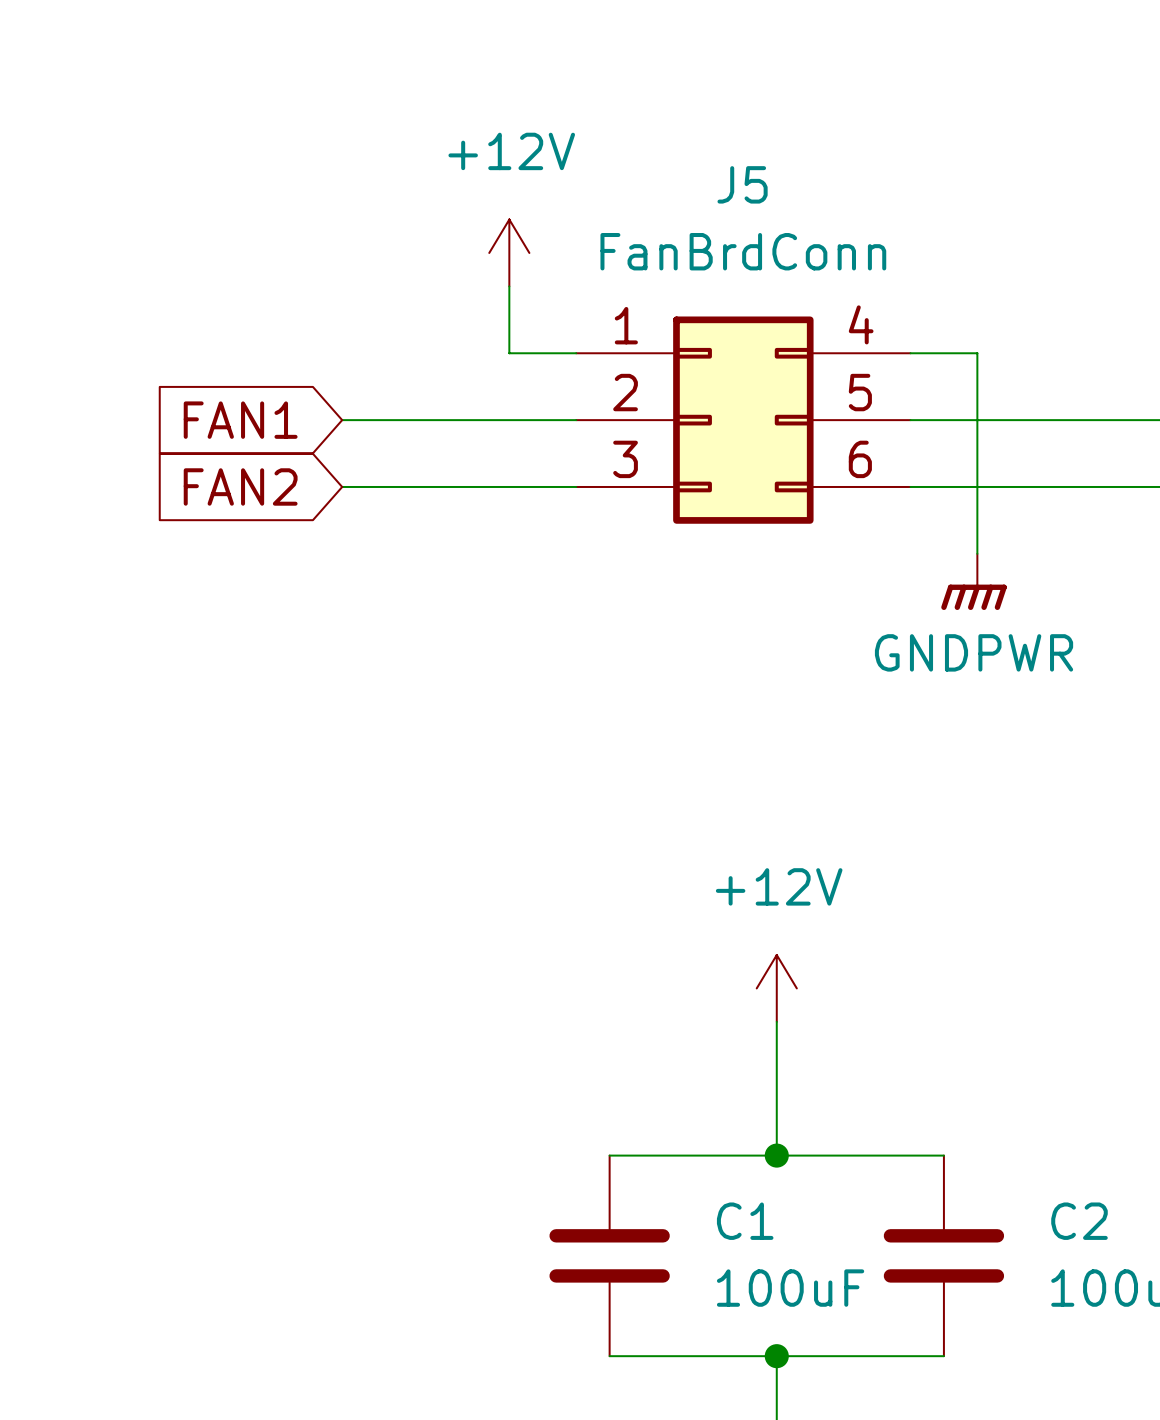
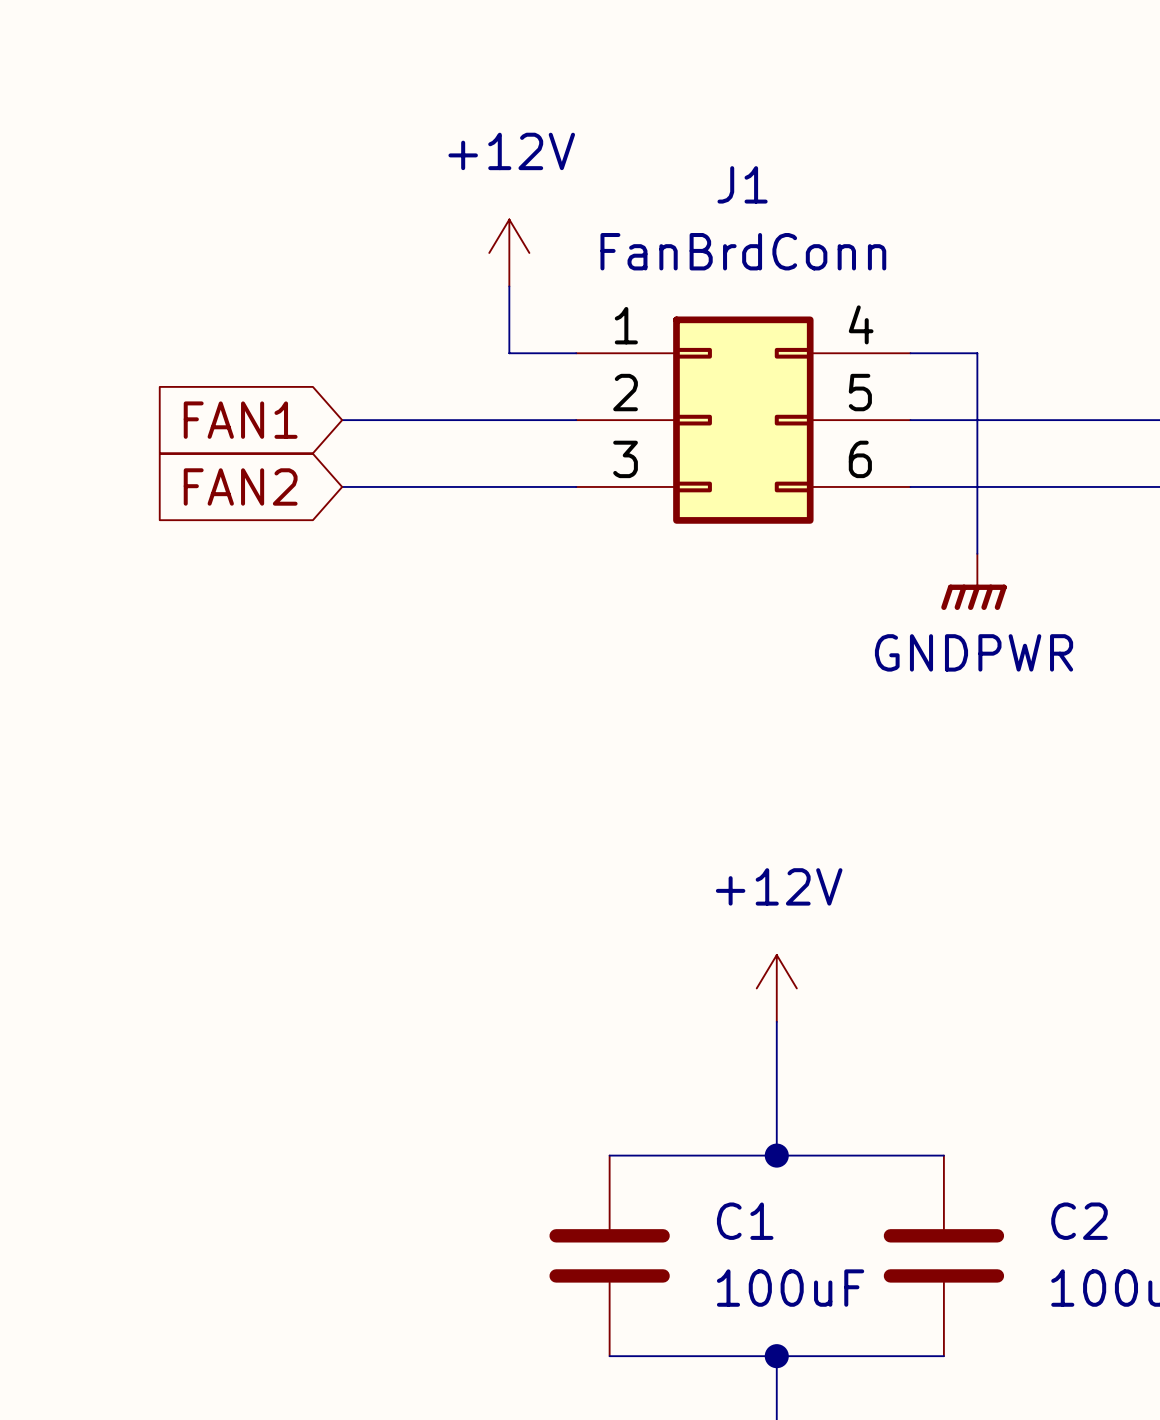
J5 name: J5 (742, 184) -> J1 (742, 184)

